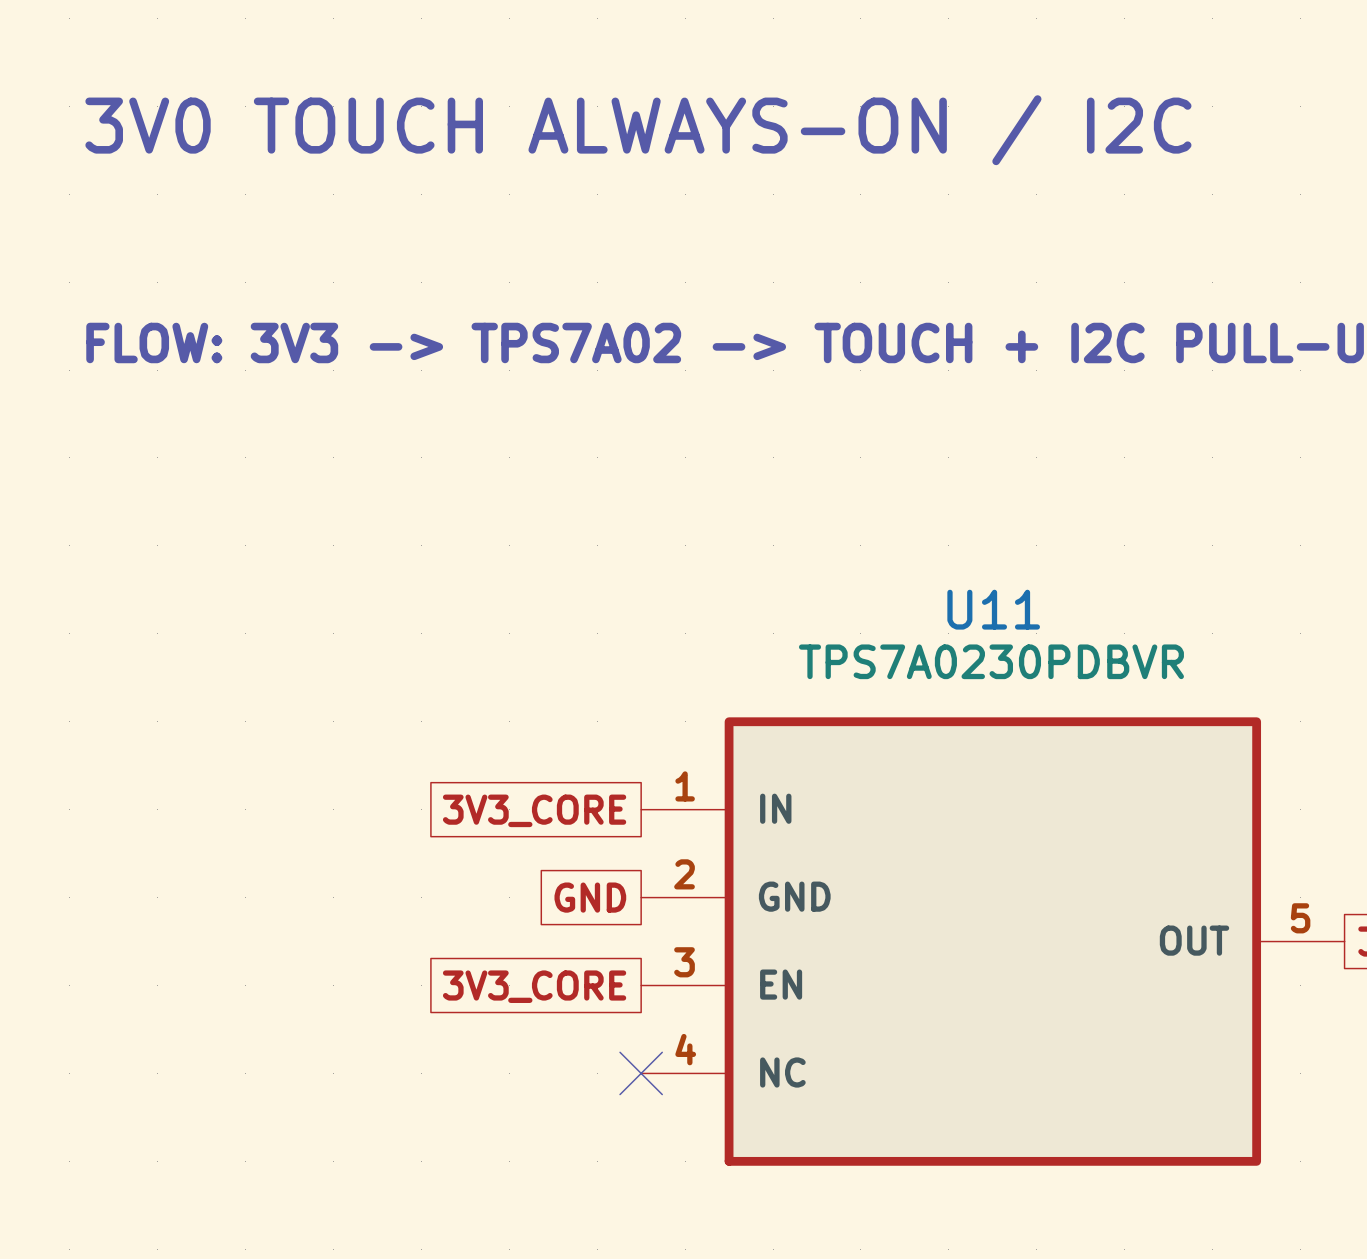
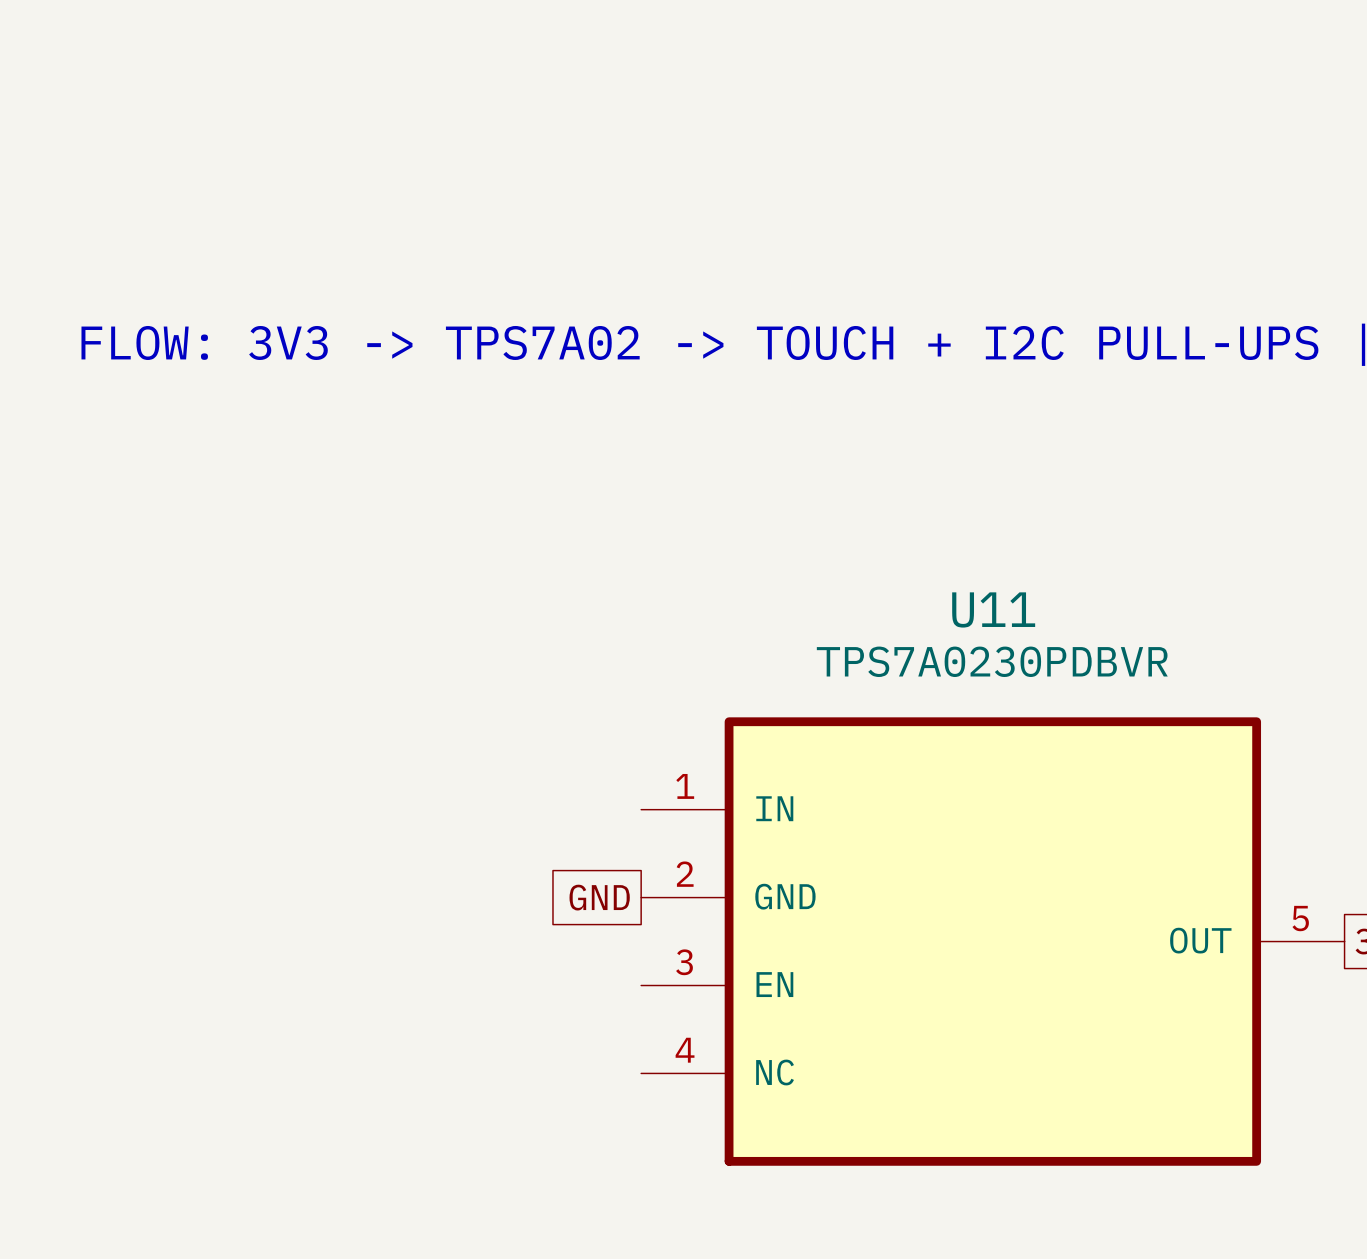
text: 3V0 TOUCH ALWAYS-ON / I2C (638, 130) -> none
global label: 3V3_CORE (534, 810) -> none
global label: 3V3_CORE (534, 986) -> none
no-connect mark: (641, 1073) -> none

